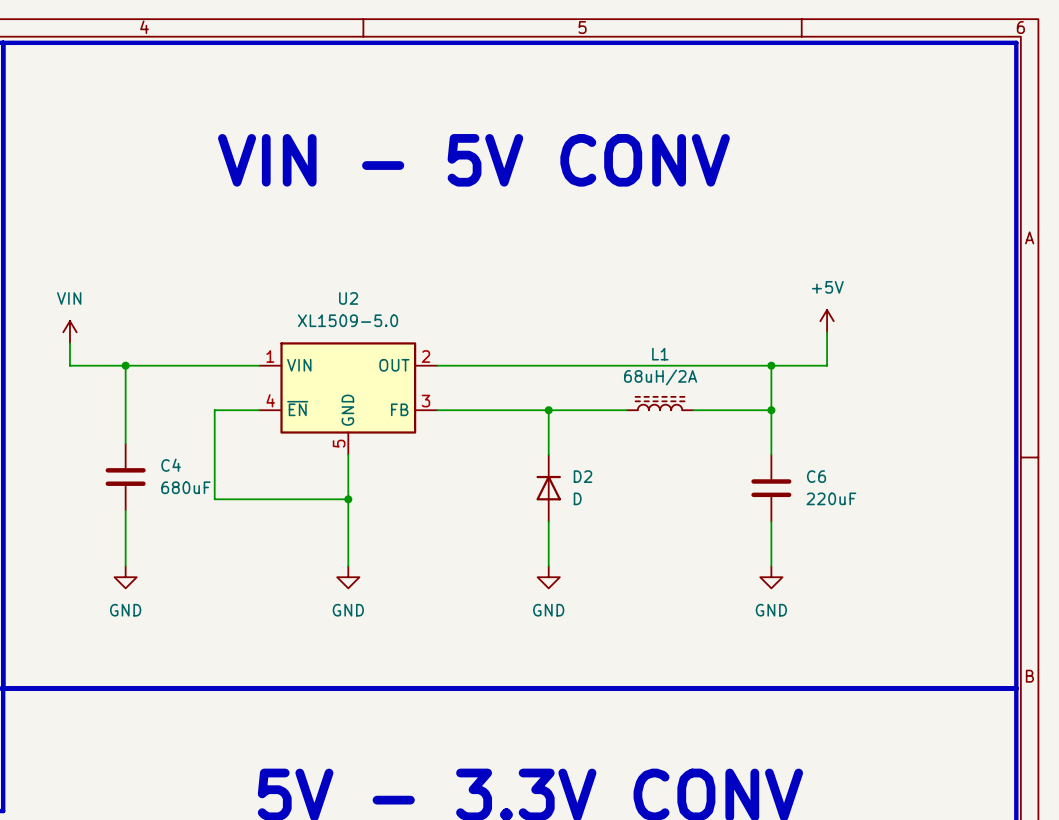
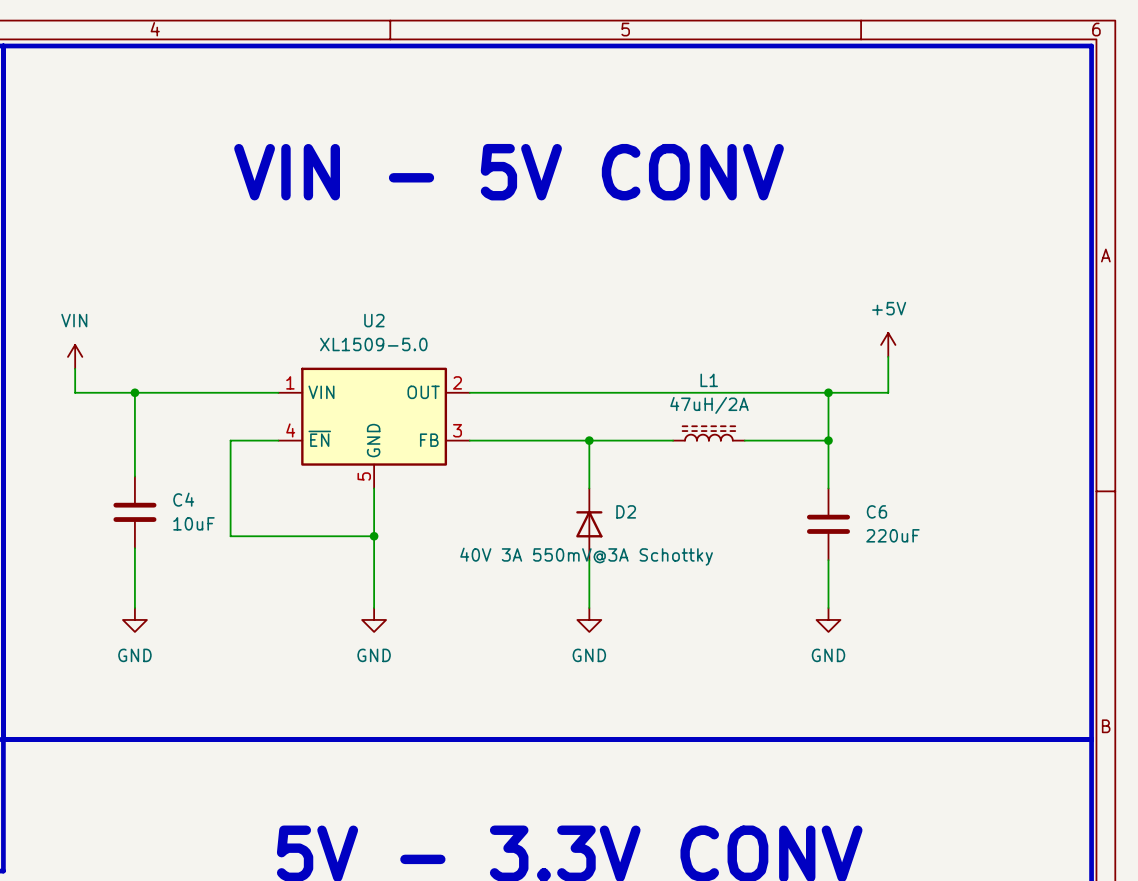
L1 value: 68uH/2A (660, 377) -> 47uH/2A (709, 405)
C4 value: 680uF (185, 487) -> 10uF (193, 523)
D2 value: D (577, 498) -> 40V 3A 550mV@3A Schottky (586, 556)

